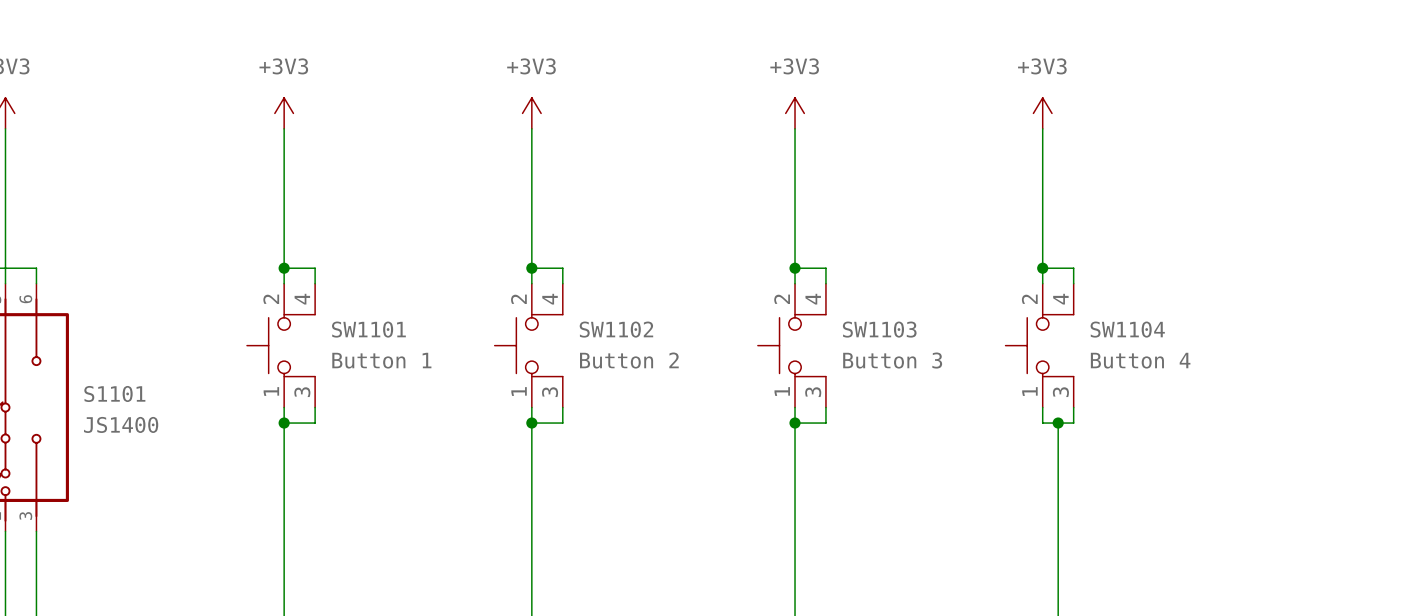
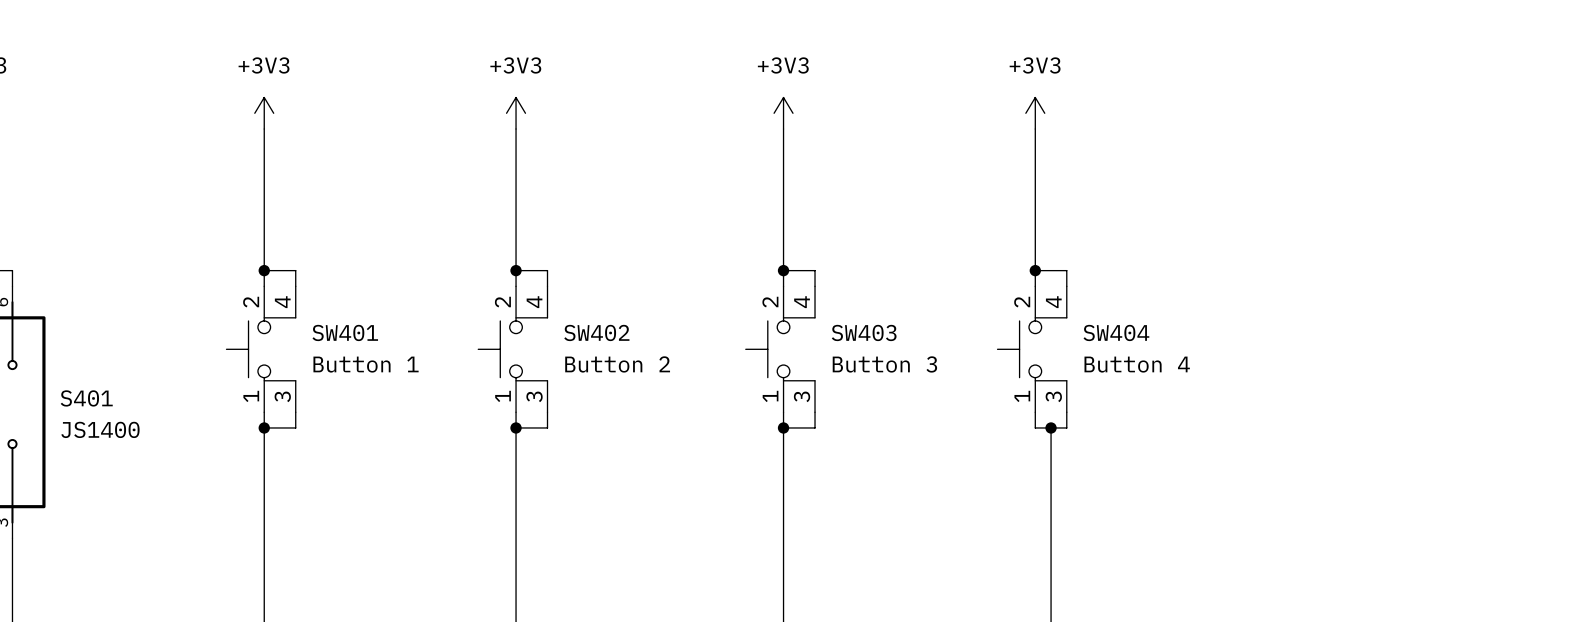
SW1101 name: SW1101 (368, 329) -> SW401 (345, 332)
SW1102 name: SW1102 (616, 329) -> SW402 (596, 332)
SW1103 name: SW1103 (879, 329) -> SW403 (864, 332)
SW1104 name: SW1104 (1127, 329) -> SW404 (1116, 332)
S1101 name: S1101 (114, 393) -> S401 (86, 398)

